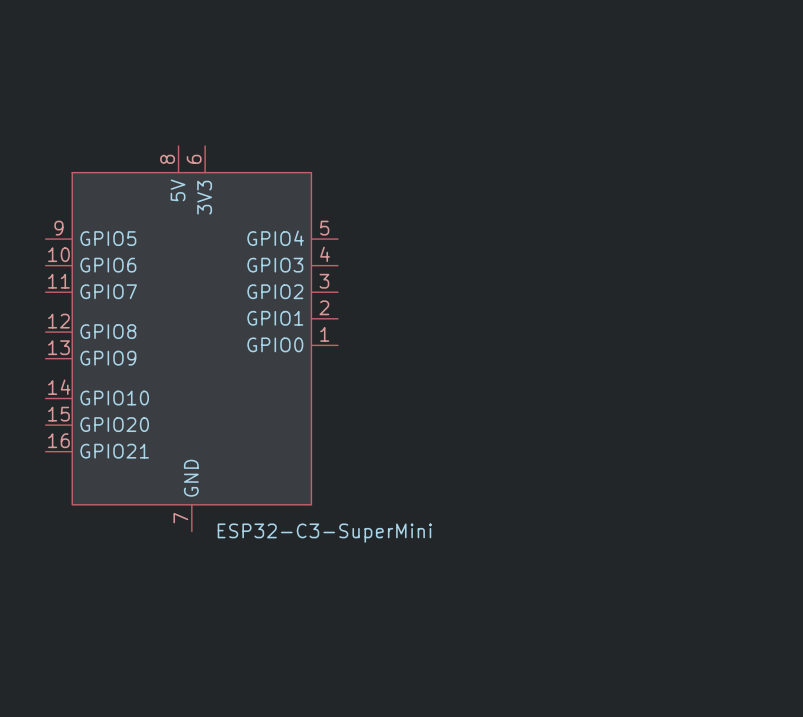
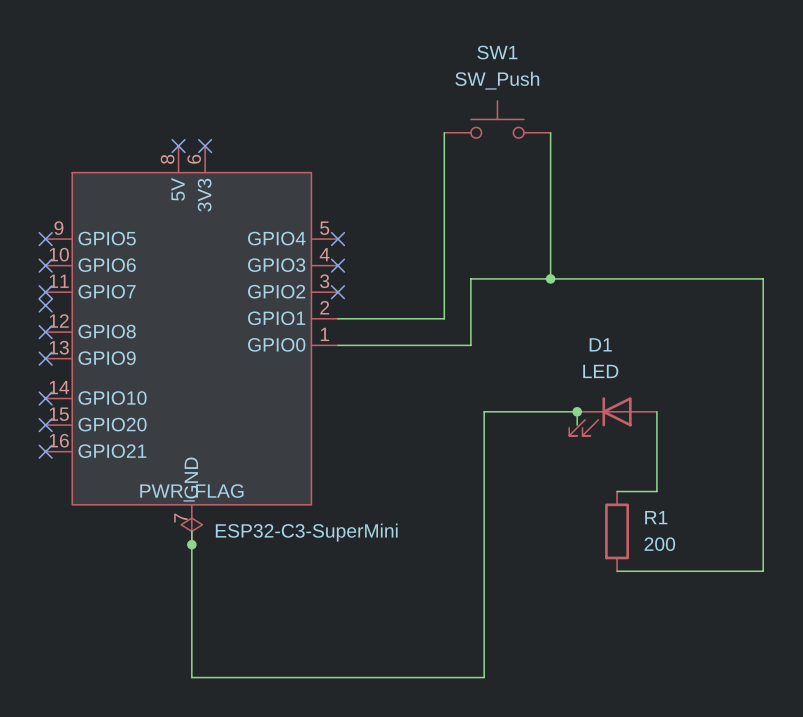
SW1: none -> SW_Push (497, 119)
wire: none -> (444, 132) (444, 318) (338, 318)
wire: none -> (550, 132) (550, 278)
no-connect mark: none -> (178, 146)
no-connect mark: none -> (205, 146)
no-connect mark: none -> (45, 239)
no-connect mark: none -> (338, 239)
no-connect mark: none -> (45, 265)
no-connect mark: none -> (338, 265)
junction: none -> (550, 278)
no-connect mark: none -> (45, 292)
no-connect mark: none -> (338, 292)
no-connect mark: none -> (45, 305)
no-connect mark: none -> (45, 332)
wire: none -> (338, 345) (470, 345) (470, 278) (763, 278) (763, 571) (617, 571)
no-connect mark: none -> (45, 358)
no-connect mark: none -> (45, 398)
junction: none -> (577, 411)
wire: none -> (656, 411) (656, 491) (617, 491)
D1: none -> LED (613, 416)
no-connect mark: none -> (45, 425)
wire: none -> (577, 425) (577, 411) (484, 411) (484, 677) (191, 677) (191, 531)
no-connect mark: none -> (45, 451)
power symbol: none -> PWR_FLAG (191, 531)
R1: none -> 200 (617, 531)
junction: none -> (191, 544)

